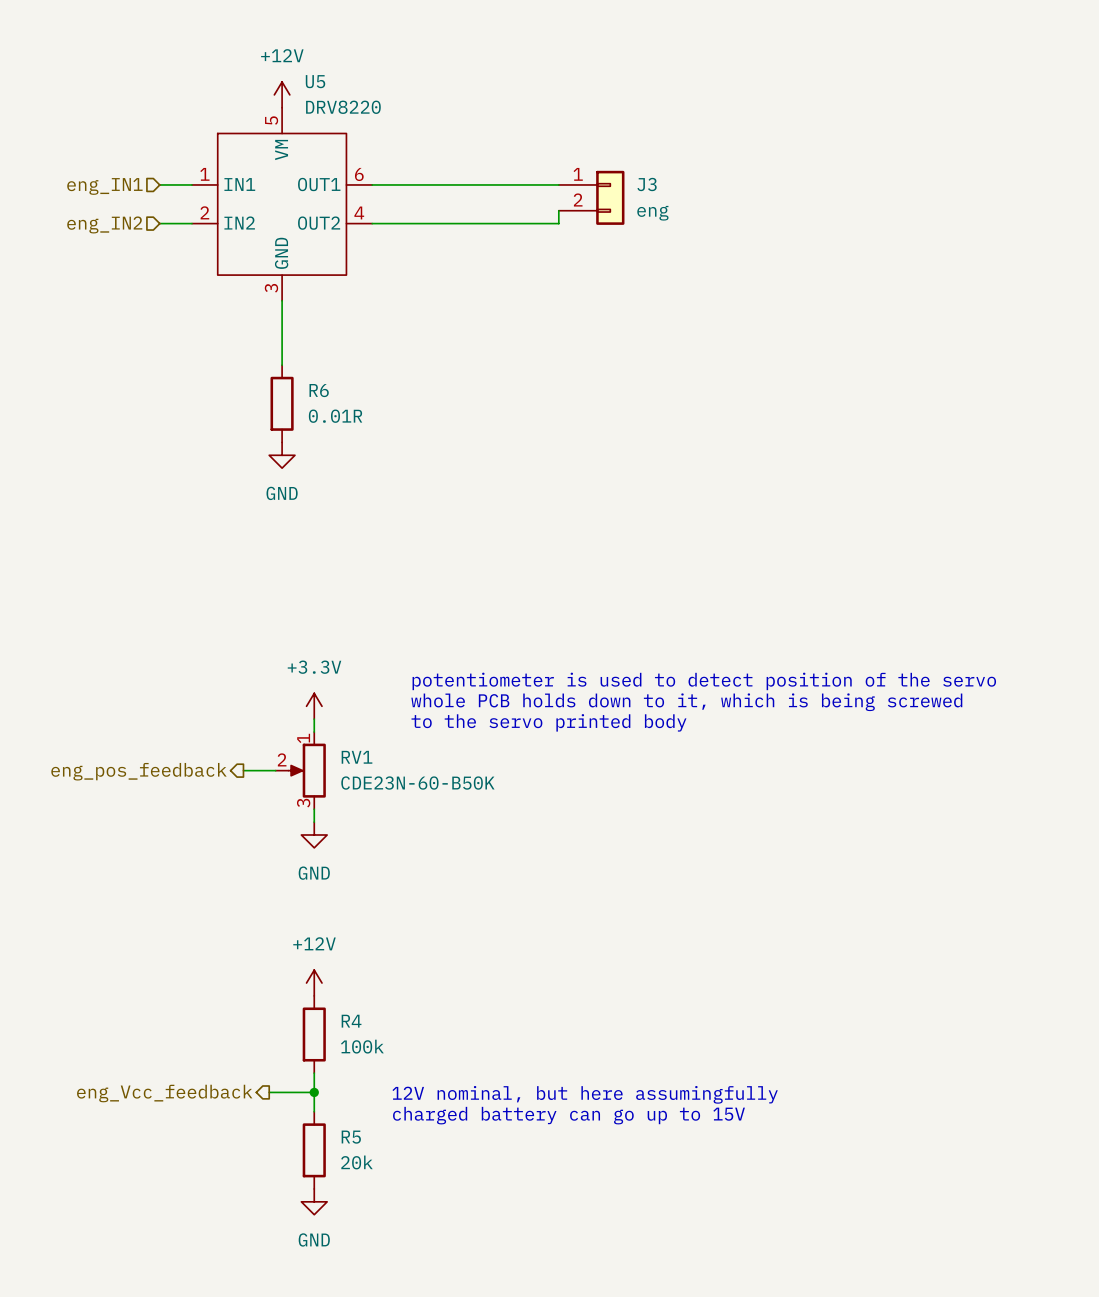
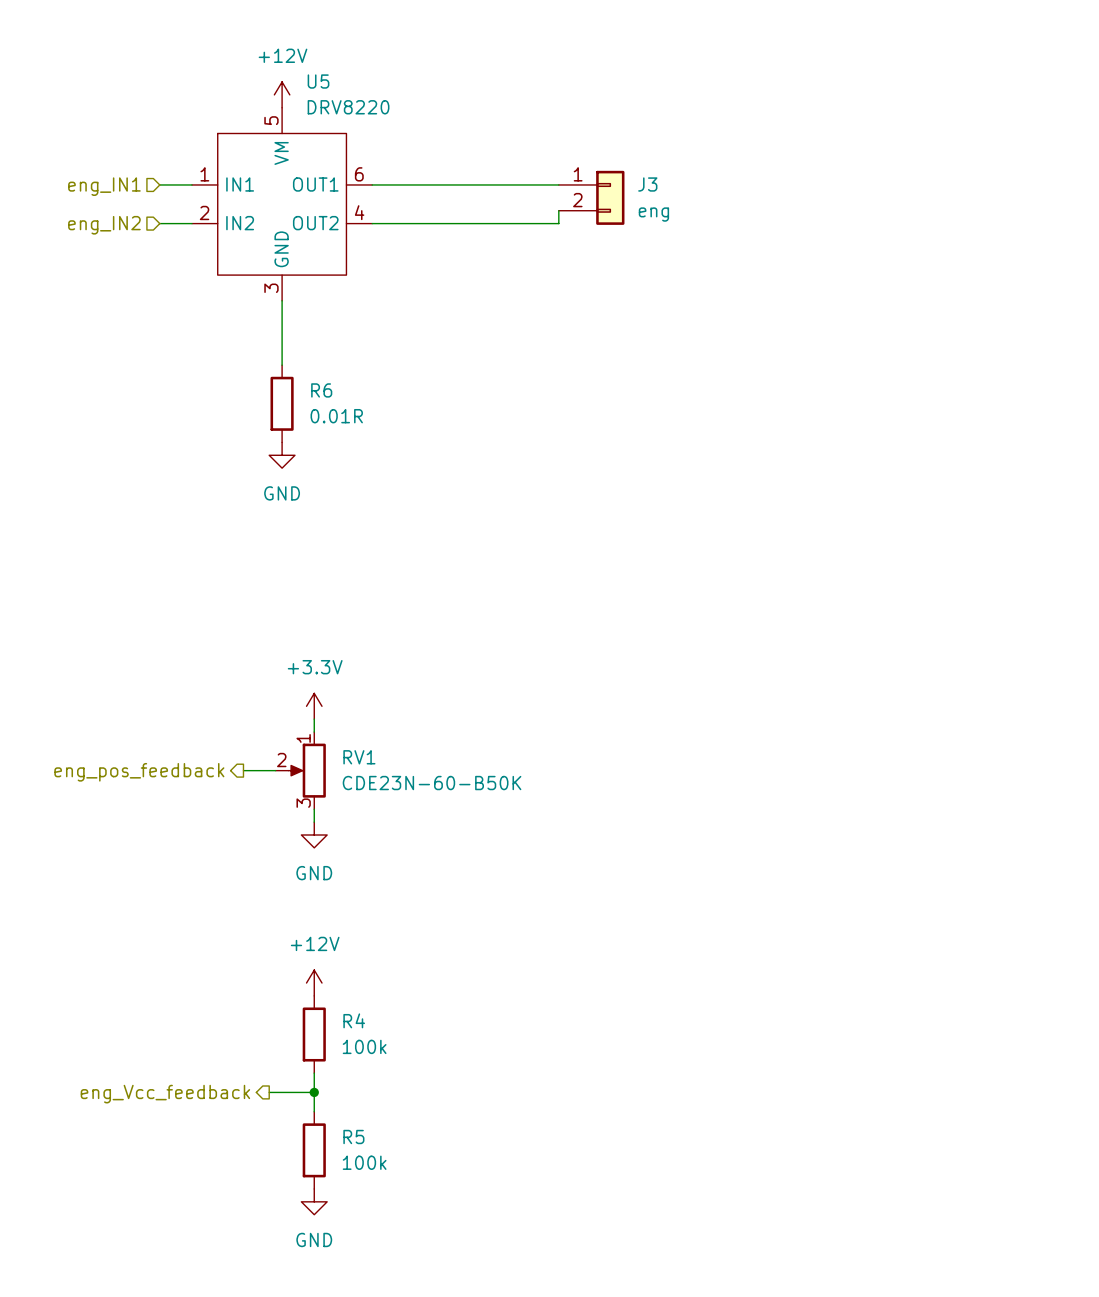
text: potentiometer is used to detect position of the servo (704, 681) -> none
text: whole PCB holds down to it, which is being screwed (686, 702) -> none
text: to the servo printed body (548, 722) -> none
text: 12V nominal, but here assumingfully (585, 1094) -> none
text: charged battery can go up to 15V (568, 1115) -> none
R5 value: 20k (356, 1162) -> 100k (364, 1162)

